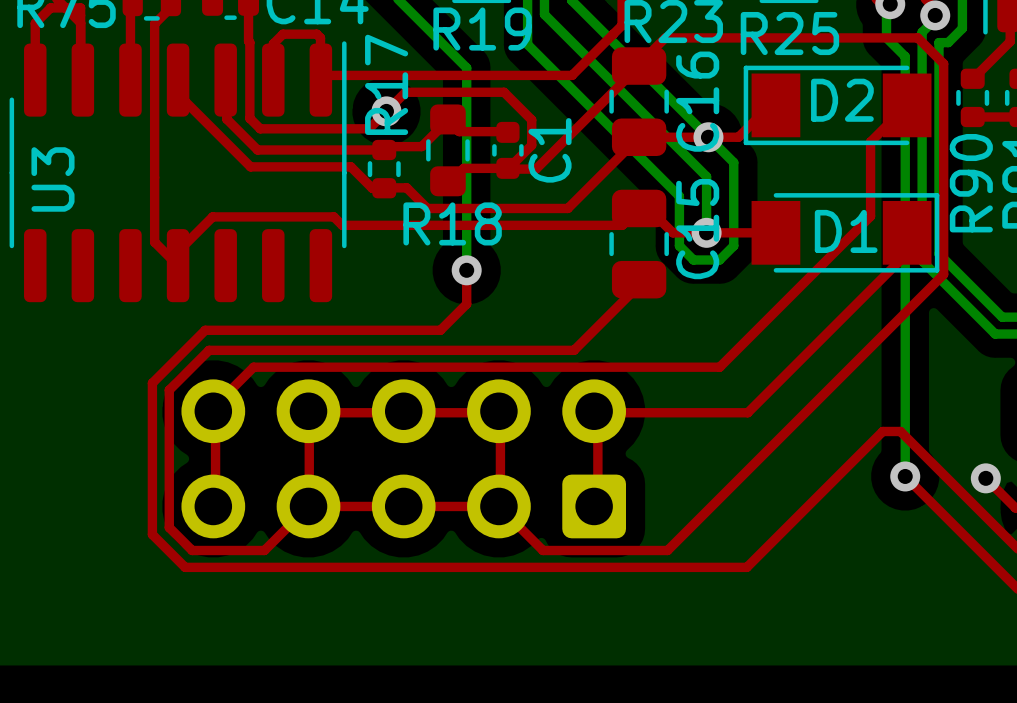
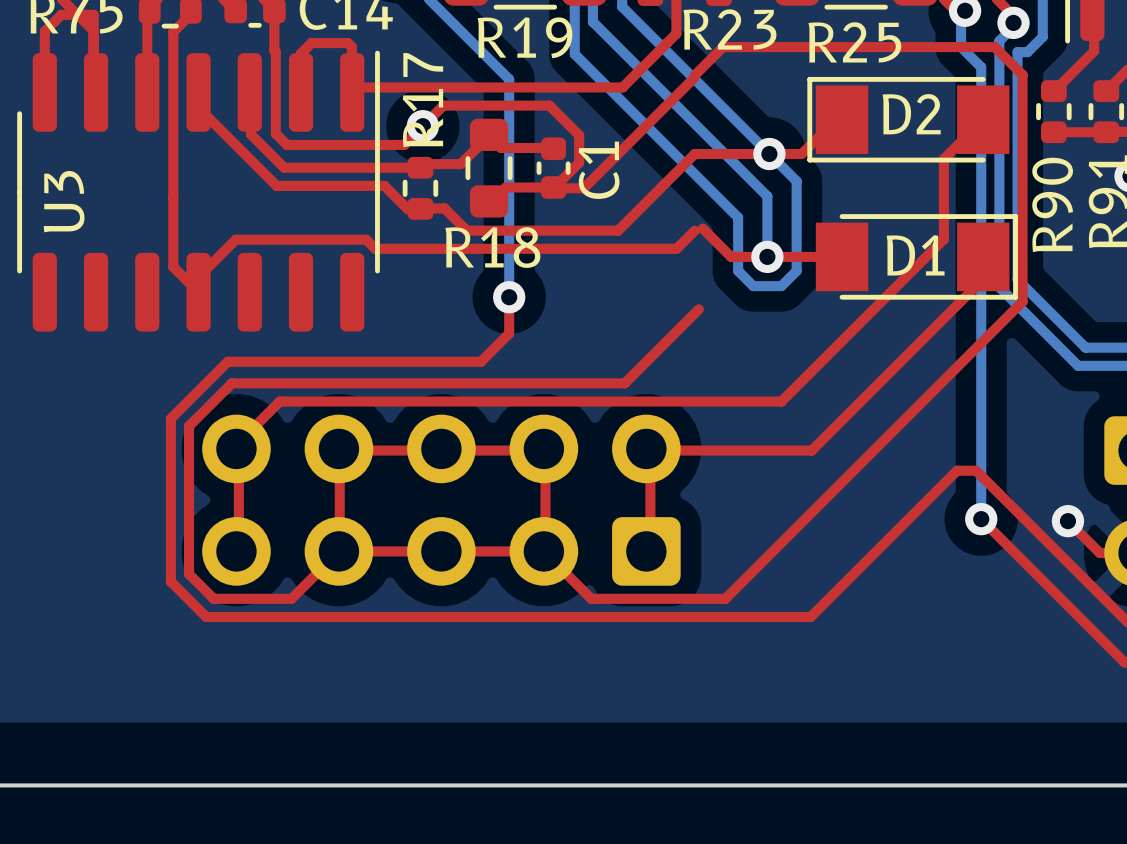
C16: (639, 101) -> none
C15: (639, 244) -> none

